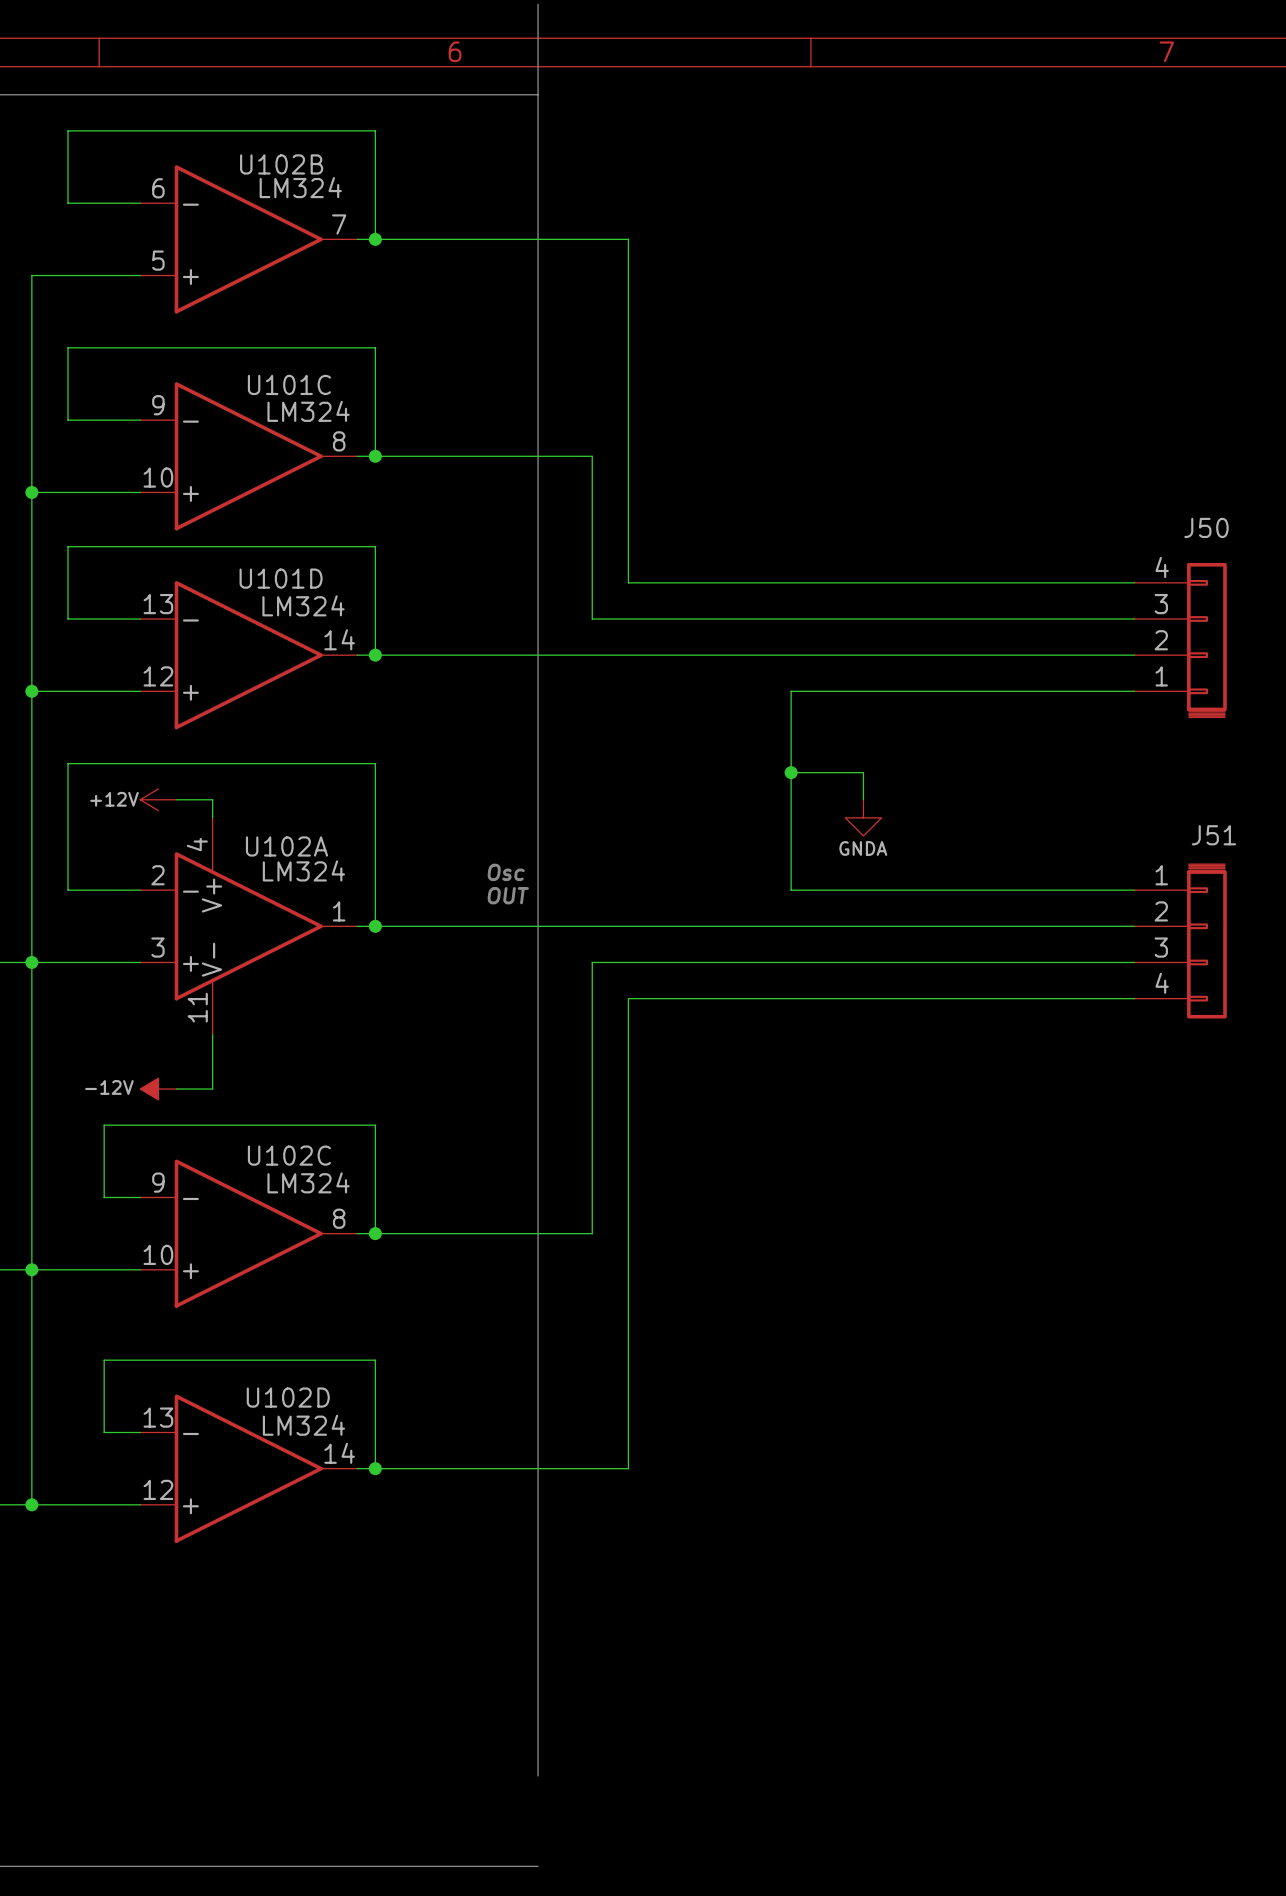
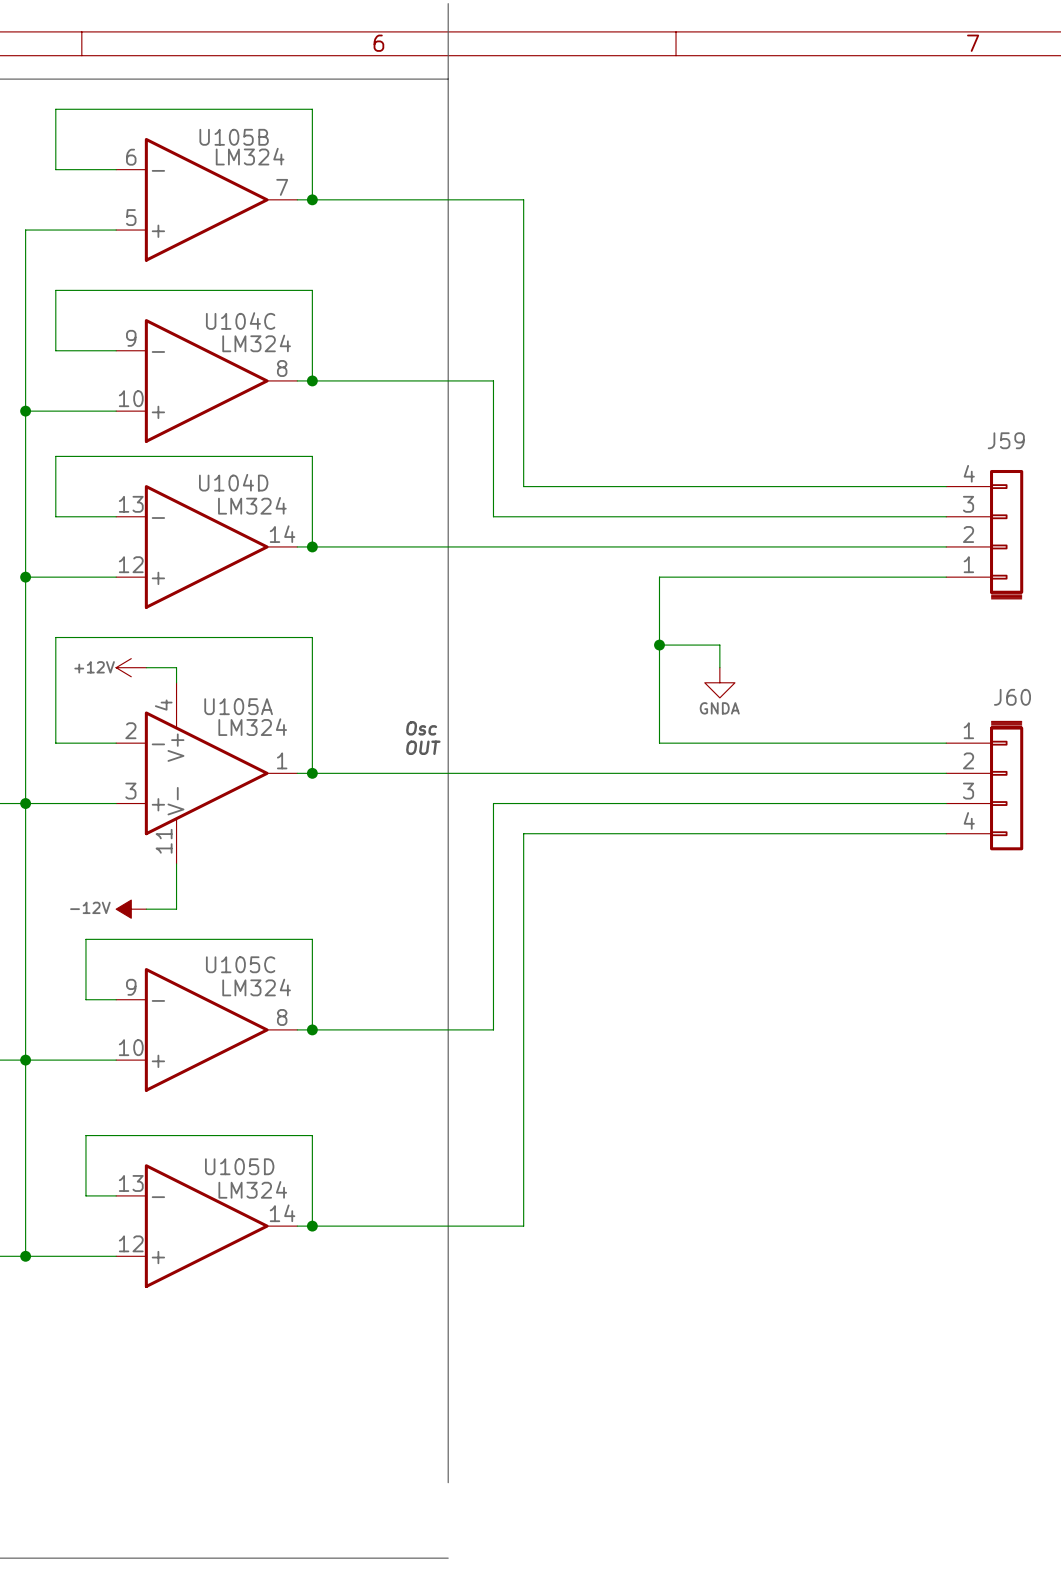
U102B name: U102B (281, 164) -> U105B (234, 137)
U101C name: U101C (289, 384) -> U104C (240, 321)
J50 name: J50 (1206, 527) -> J59 (1006, 440)
U101D name: U101D (281, 578) -> U104D (233, 482)
J51 name: J51 (1213, 835) -> J60 (1012, 697)
U102A name: U102A (287, 846) -> U105A (238, 706)
U102C name: U102C (289, 1155) -> U105C (240, 964)
U102D name: U102D (288, 1397) -> U105D (239, 1166)

